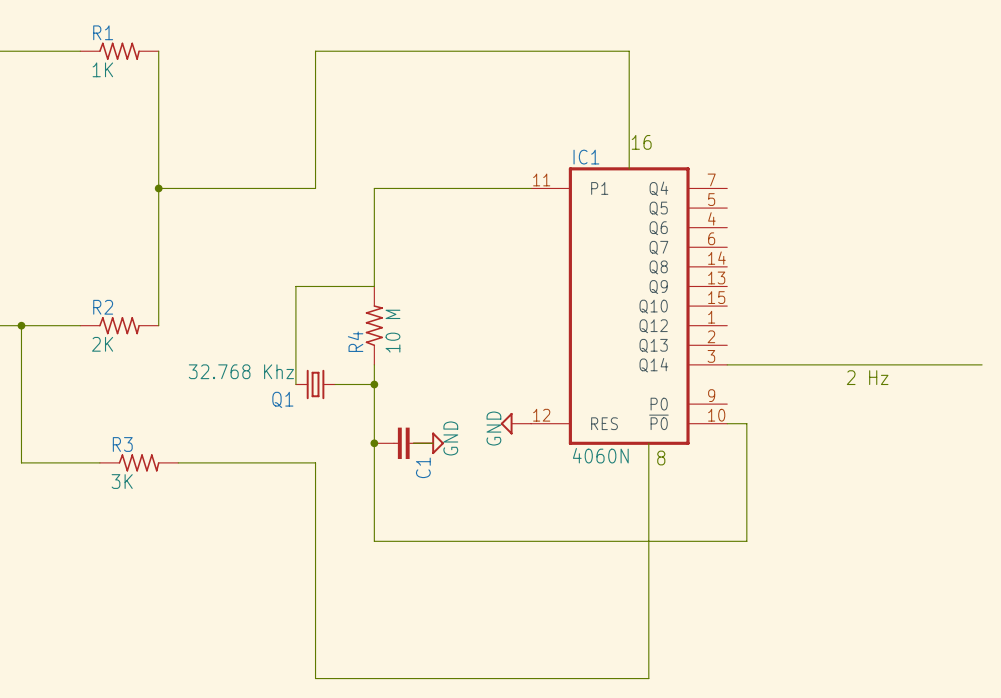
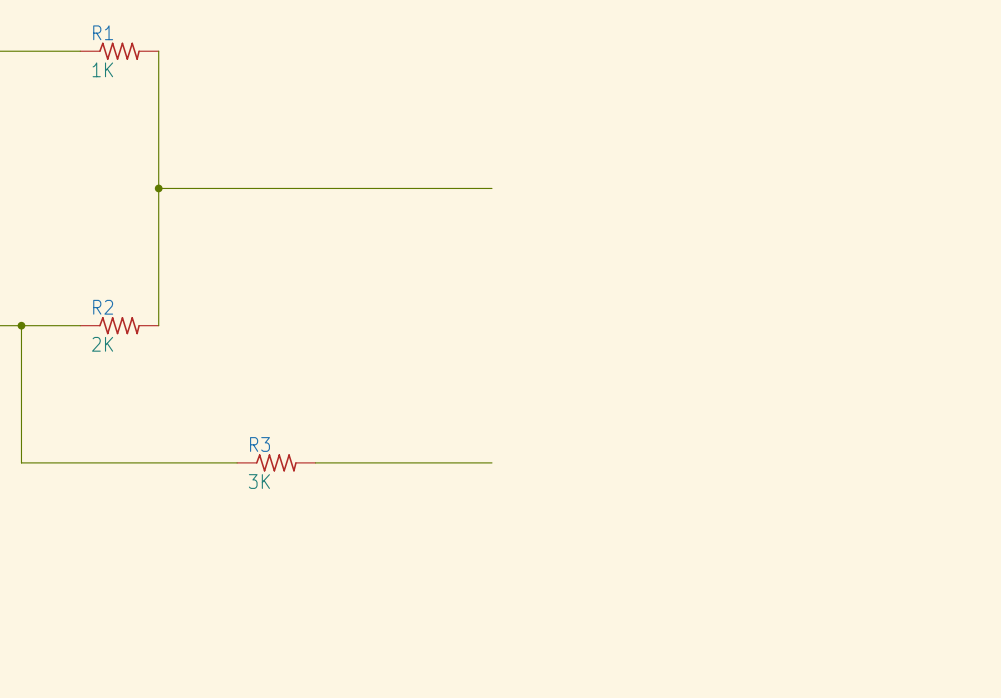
text: 16 (641, 142) -> none
wire: (629, 168) (629, 51) (315, 51) (315, 188) -> none
wire: (374, 188) (374, 286) (295, 286) (295, 384) -> (374, 188) (315, 188)
wire: (491, 188) (531, 188) -> none
IC1: 4060N (629, 306) -> none
R4: 10 M (374, 325) -> none
wire: (374, 364) (374, 541) (746, 541) (746, 423) (727, 423) -> none
wire: (727, 364) (982, 364) -> none
text: 2 Hz (867, 377) -> none
Q1: 32.768 Khz (315, 384) -> none
wire: (335, 384) (374, 384) -> none
junction: (374, 384) -> none
power symbol: GND (515, 423) -> none
junction: (374, 443) -> none
C1: (403, 443) -> none
wire: (413, 443) (433, 443) -> none
power symbol: GND (428, 443) -> none
wire: (648, 443) (648, 678) (315, 678) (315, 462) (237, 462) -> none
text: 8 (661, 458) -> none
R3 position: (139, 462) -> (276, 462)
wire: none -> (315, 462) (491, 462)

